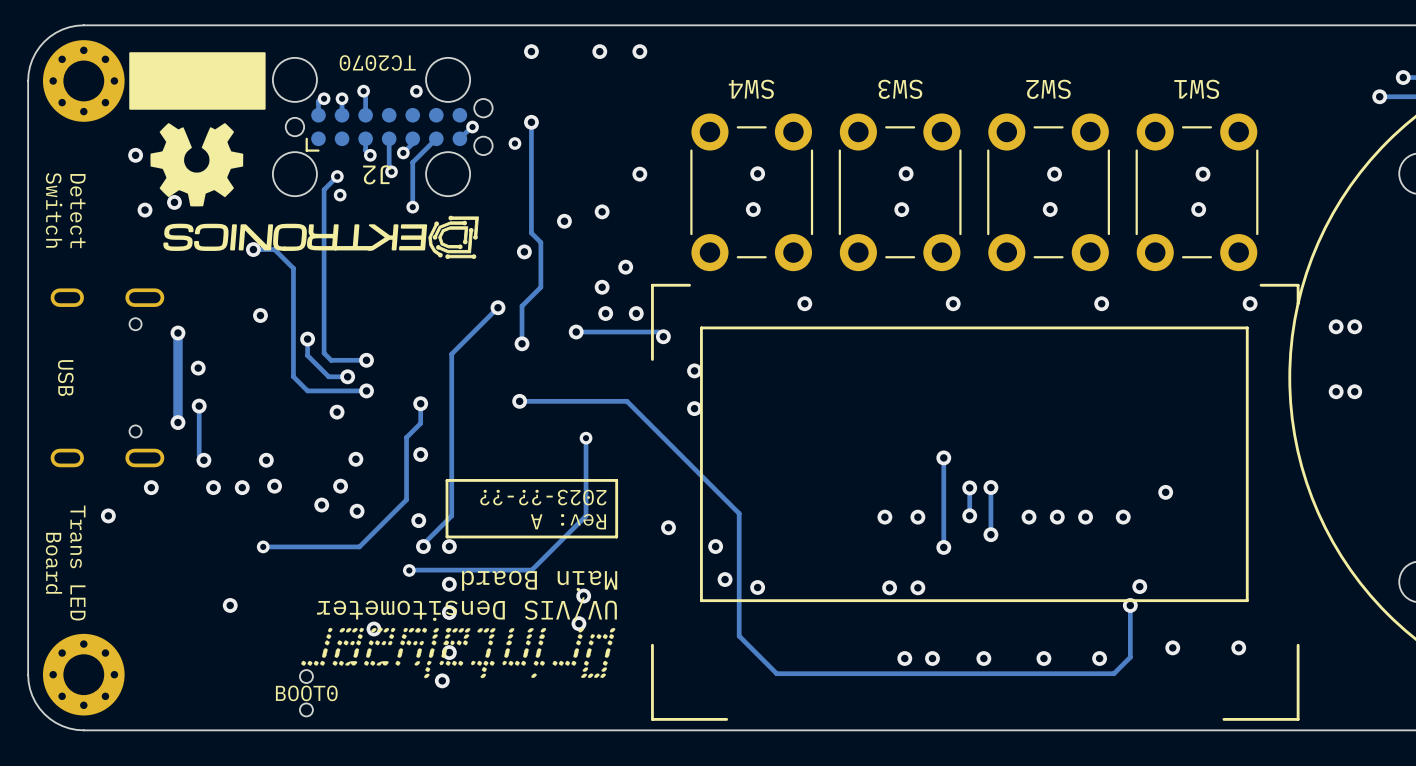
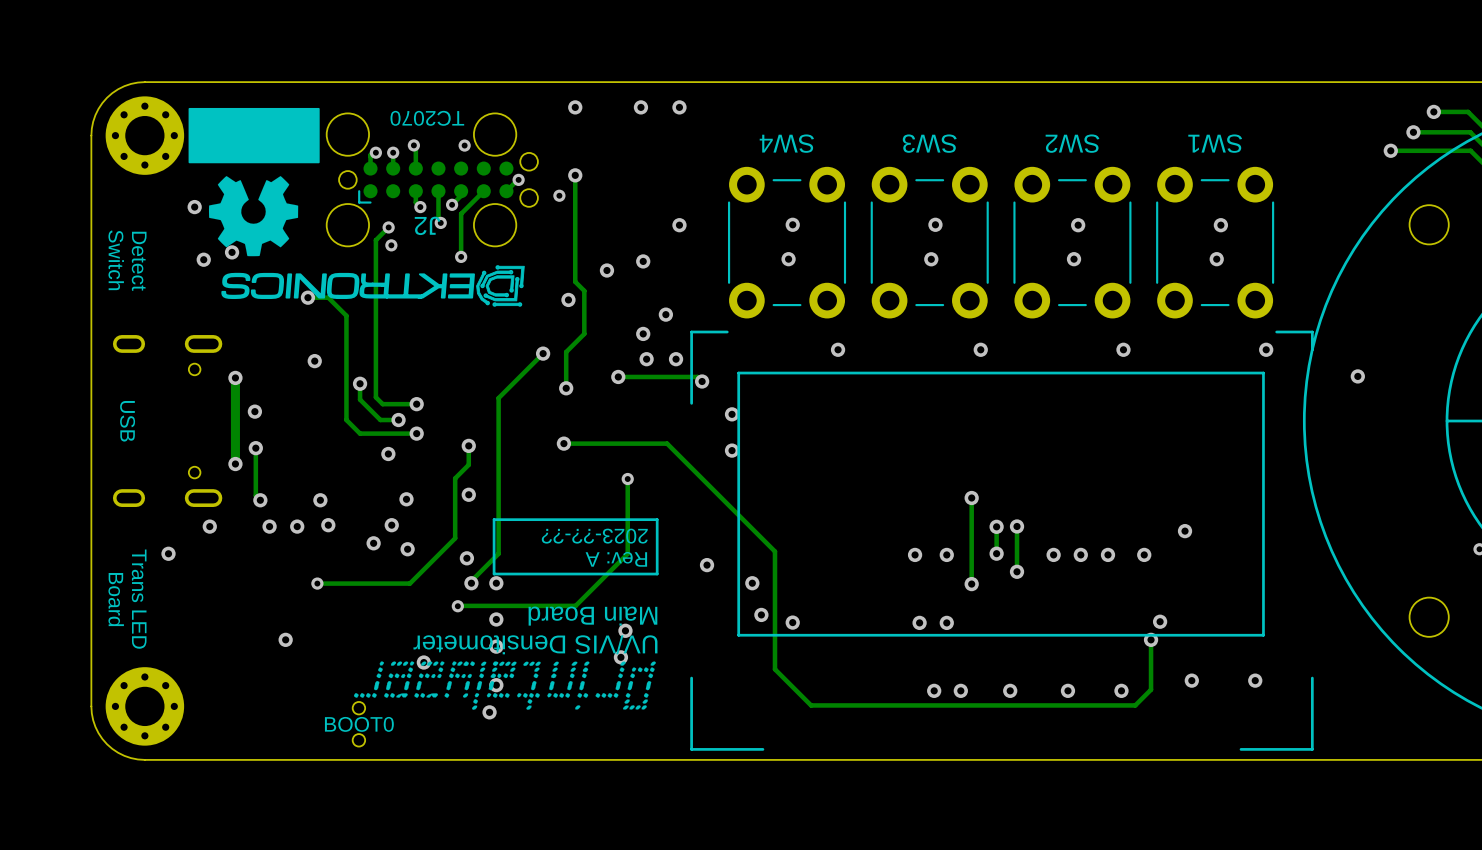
via: (1336, 326) -> none
via: (1354, 326) -> none
via: none -> (1357, 376)
via: (1336, 391) -> none
via: (1354, 391) -> none

